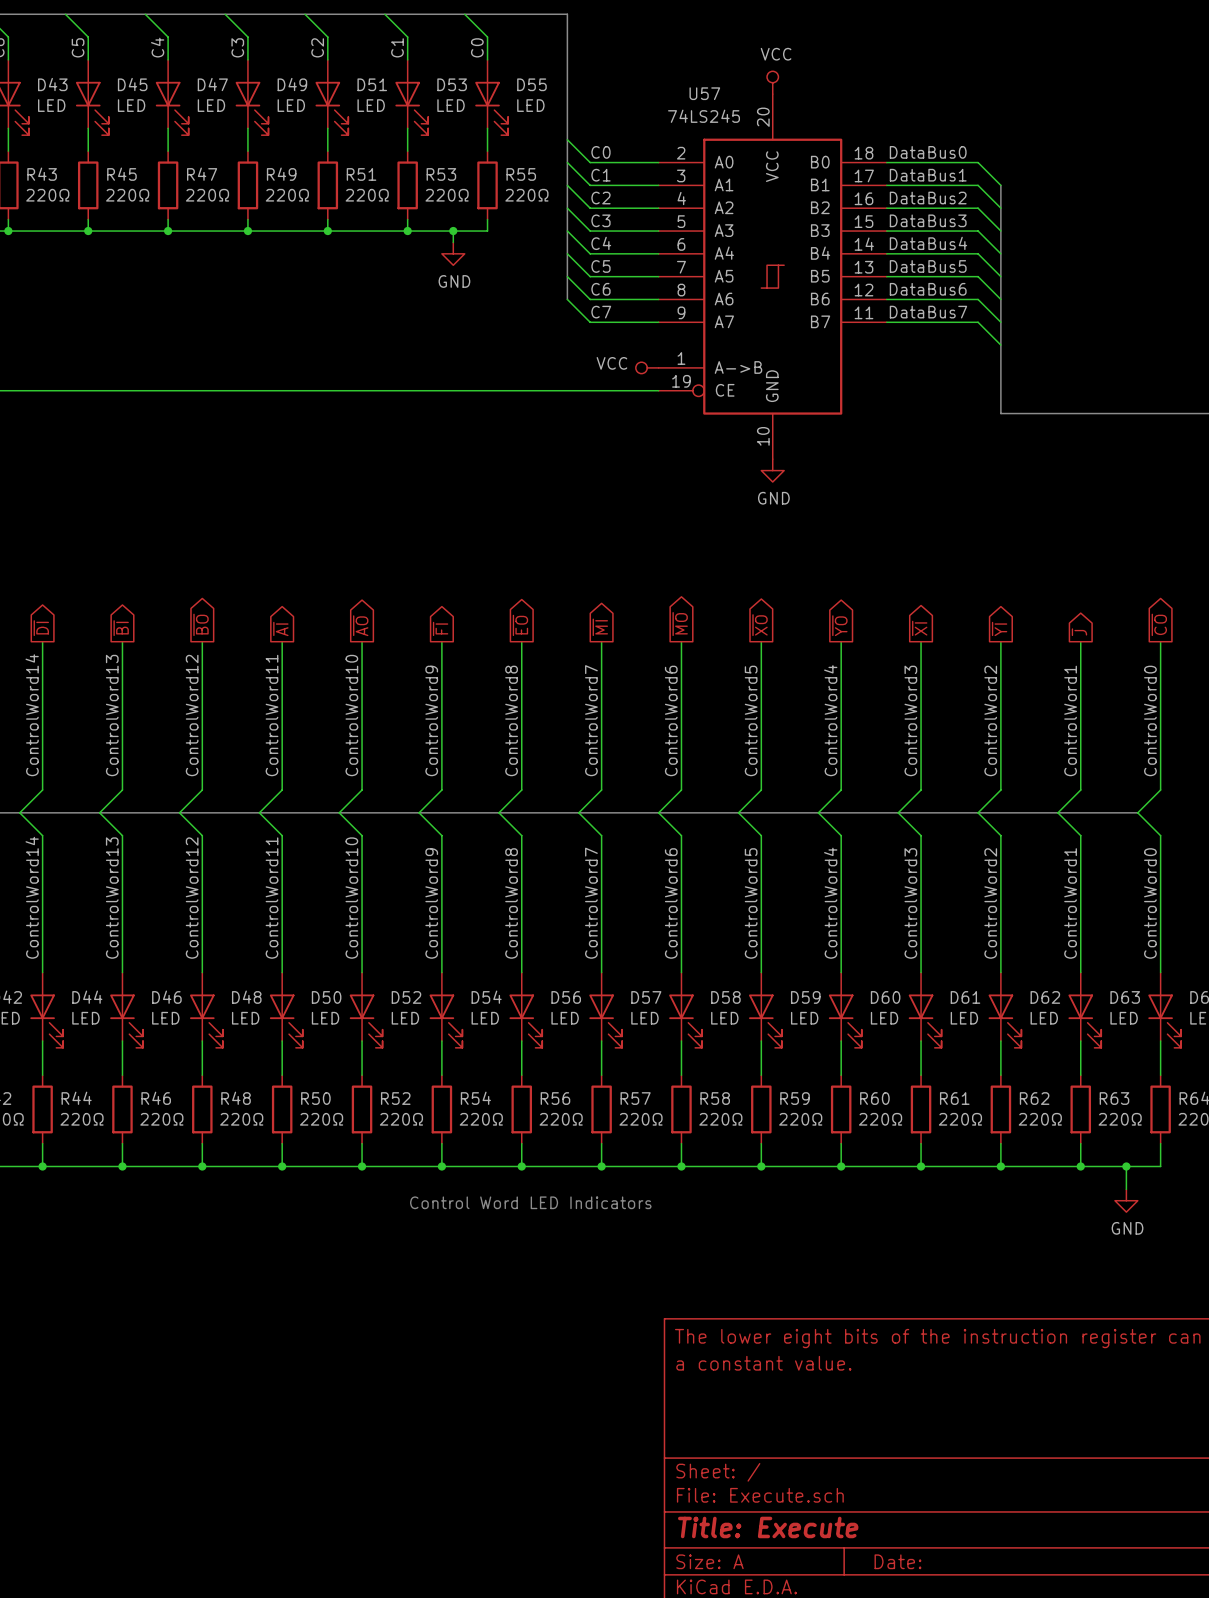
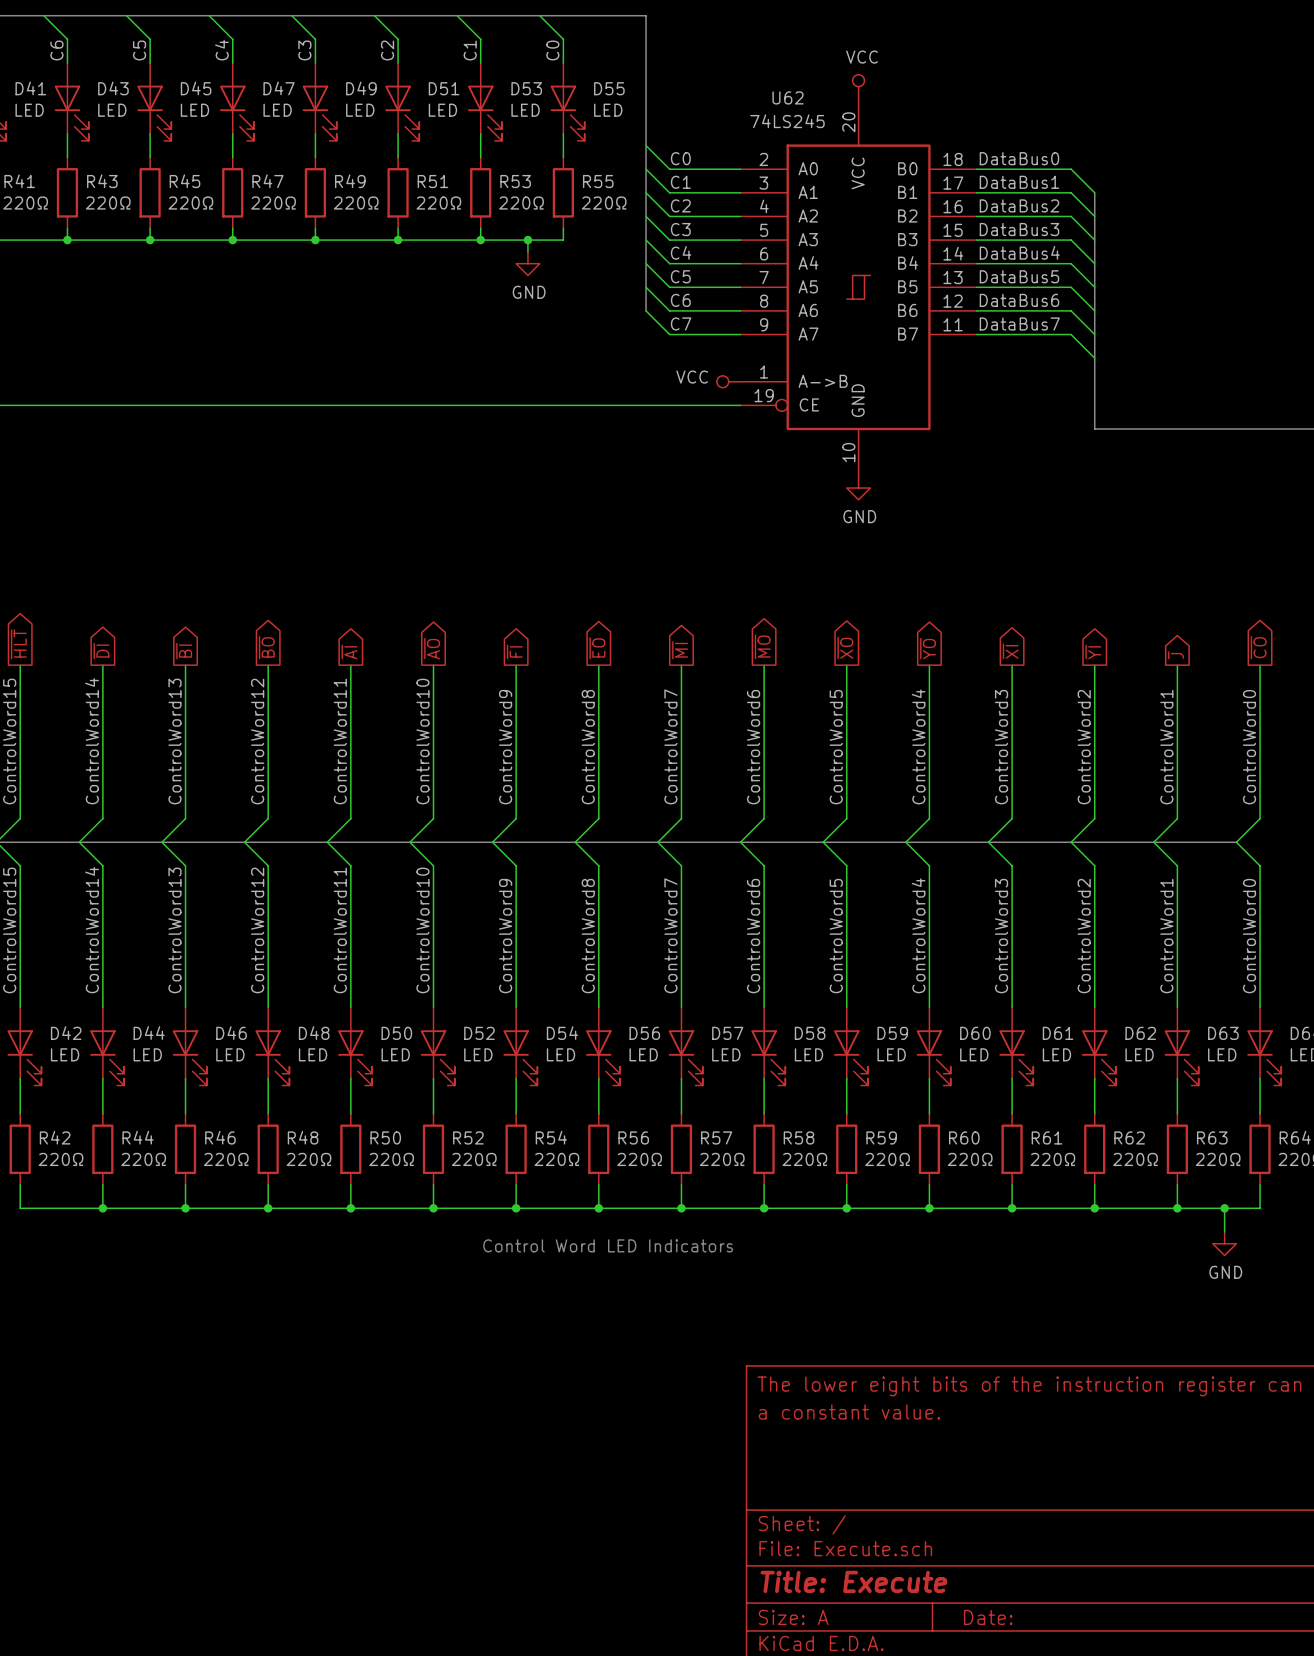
U57 name: U57 (704, 93) -> U62 (788, 97)

